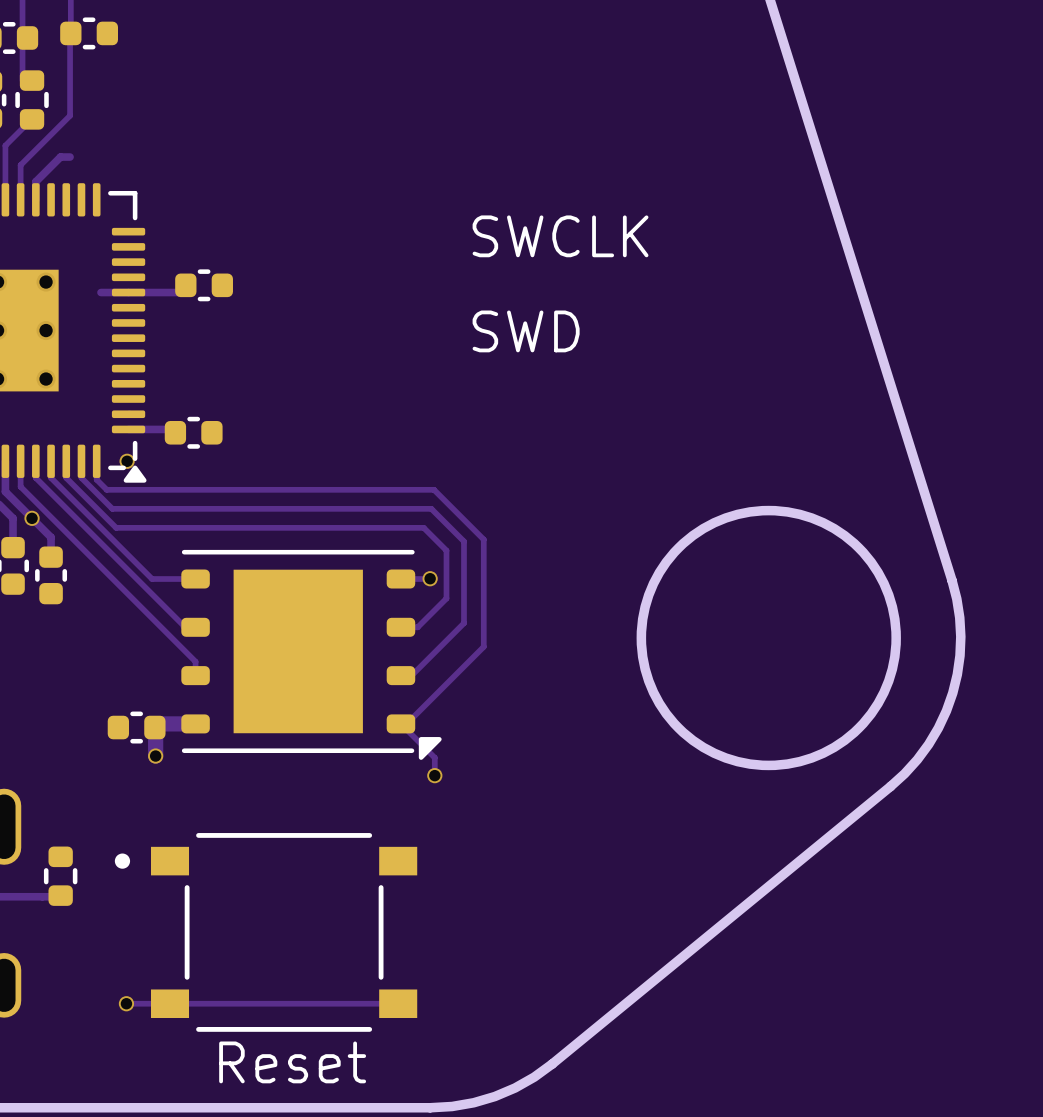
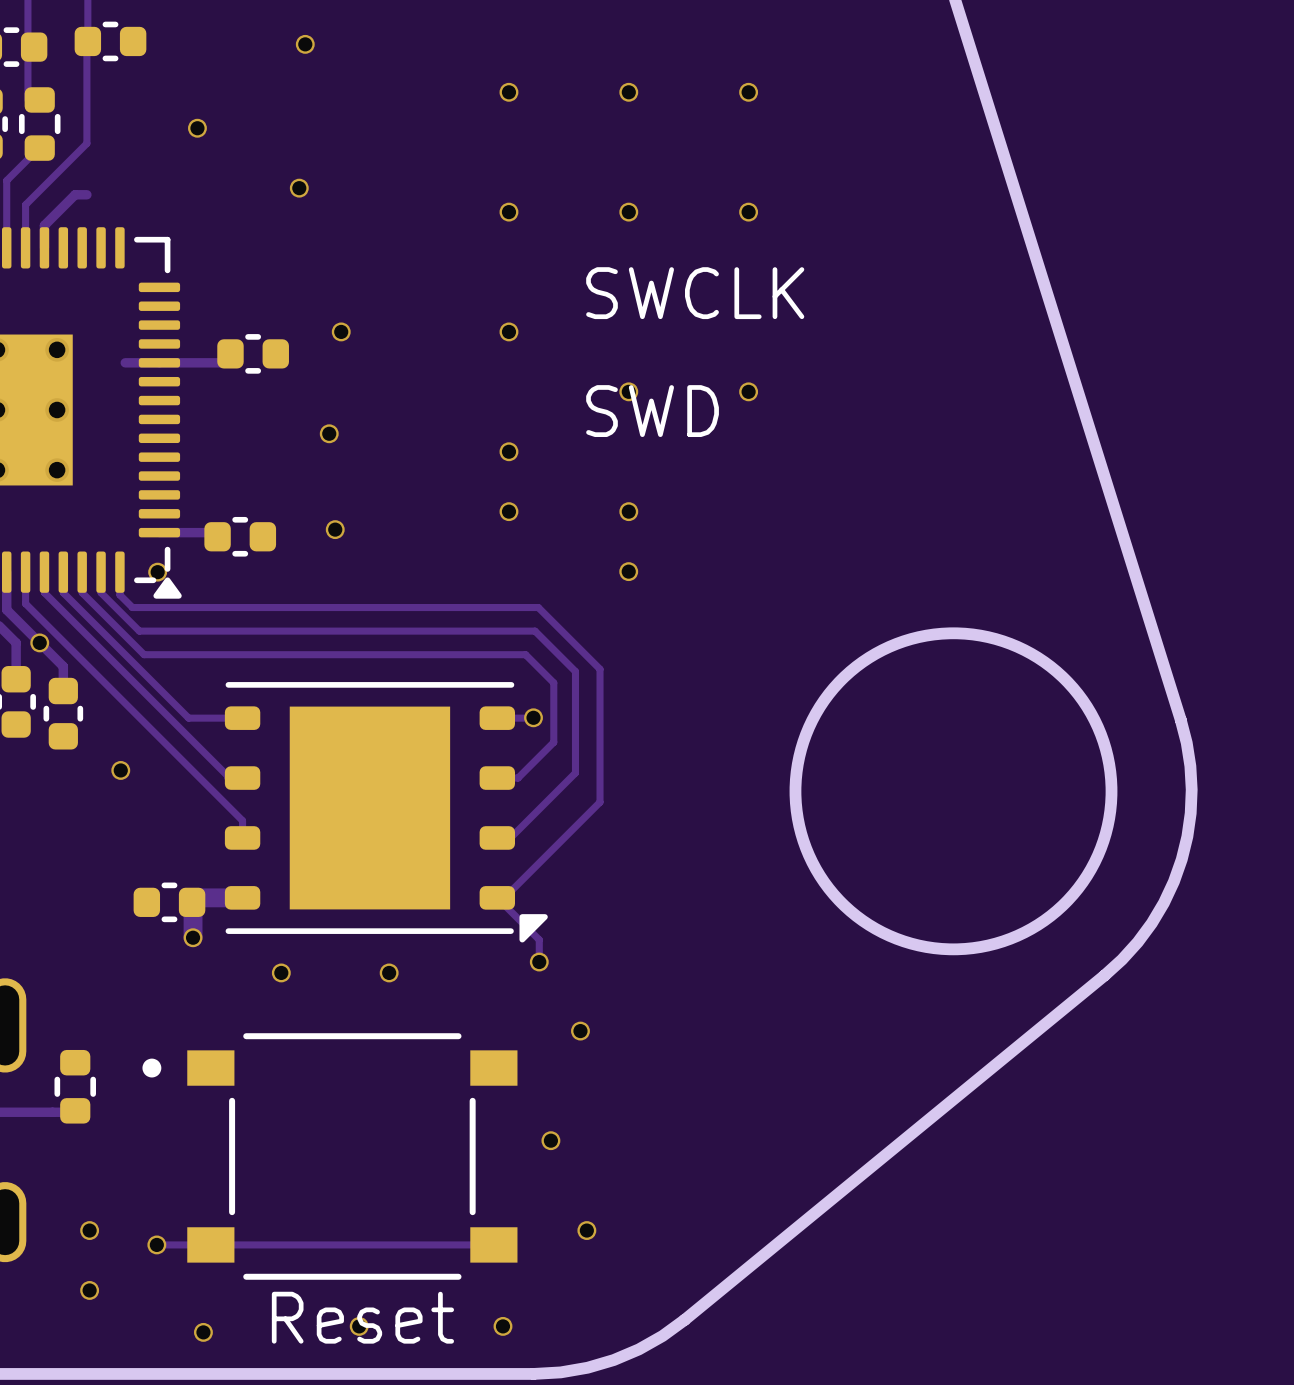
via: none -> (305, 44)
via: none -> (508, 92)
via: none -> (628, 92)
via: none -> (748, 92)
via: none -> (197, 128)
via: none -> (299, 188)
via: none -> (508, 212)
via: none -> (628, 212)
via: none -> (748, 212)
via: none -> (341, 331)
via: none -> (508, 331)
via: none -> (628, 391)
via: none -> (748, 391)
via: none -> (329, 433)
via: none -> (508, 451)
via: none -> (508, 511)
via: none -> (628, 511)
via: none -> (335, 529)
via: none -> (628, 571)
via: none -> (120, 770)
via: none -> (281, 972)
via: none -> (389, 972)
via: none -> (580, 1031)
via: none -> (550, 1140)
via: none -> (89, 1230)
via: none -> (586, 1230)
via: none -> (89, 1290)
via: none -> (359, 1326)
via: none -> (502, 1326)
via: none -> (203, 1332)

